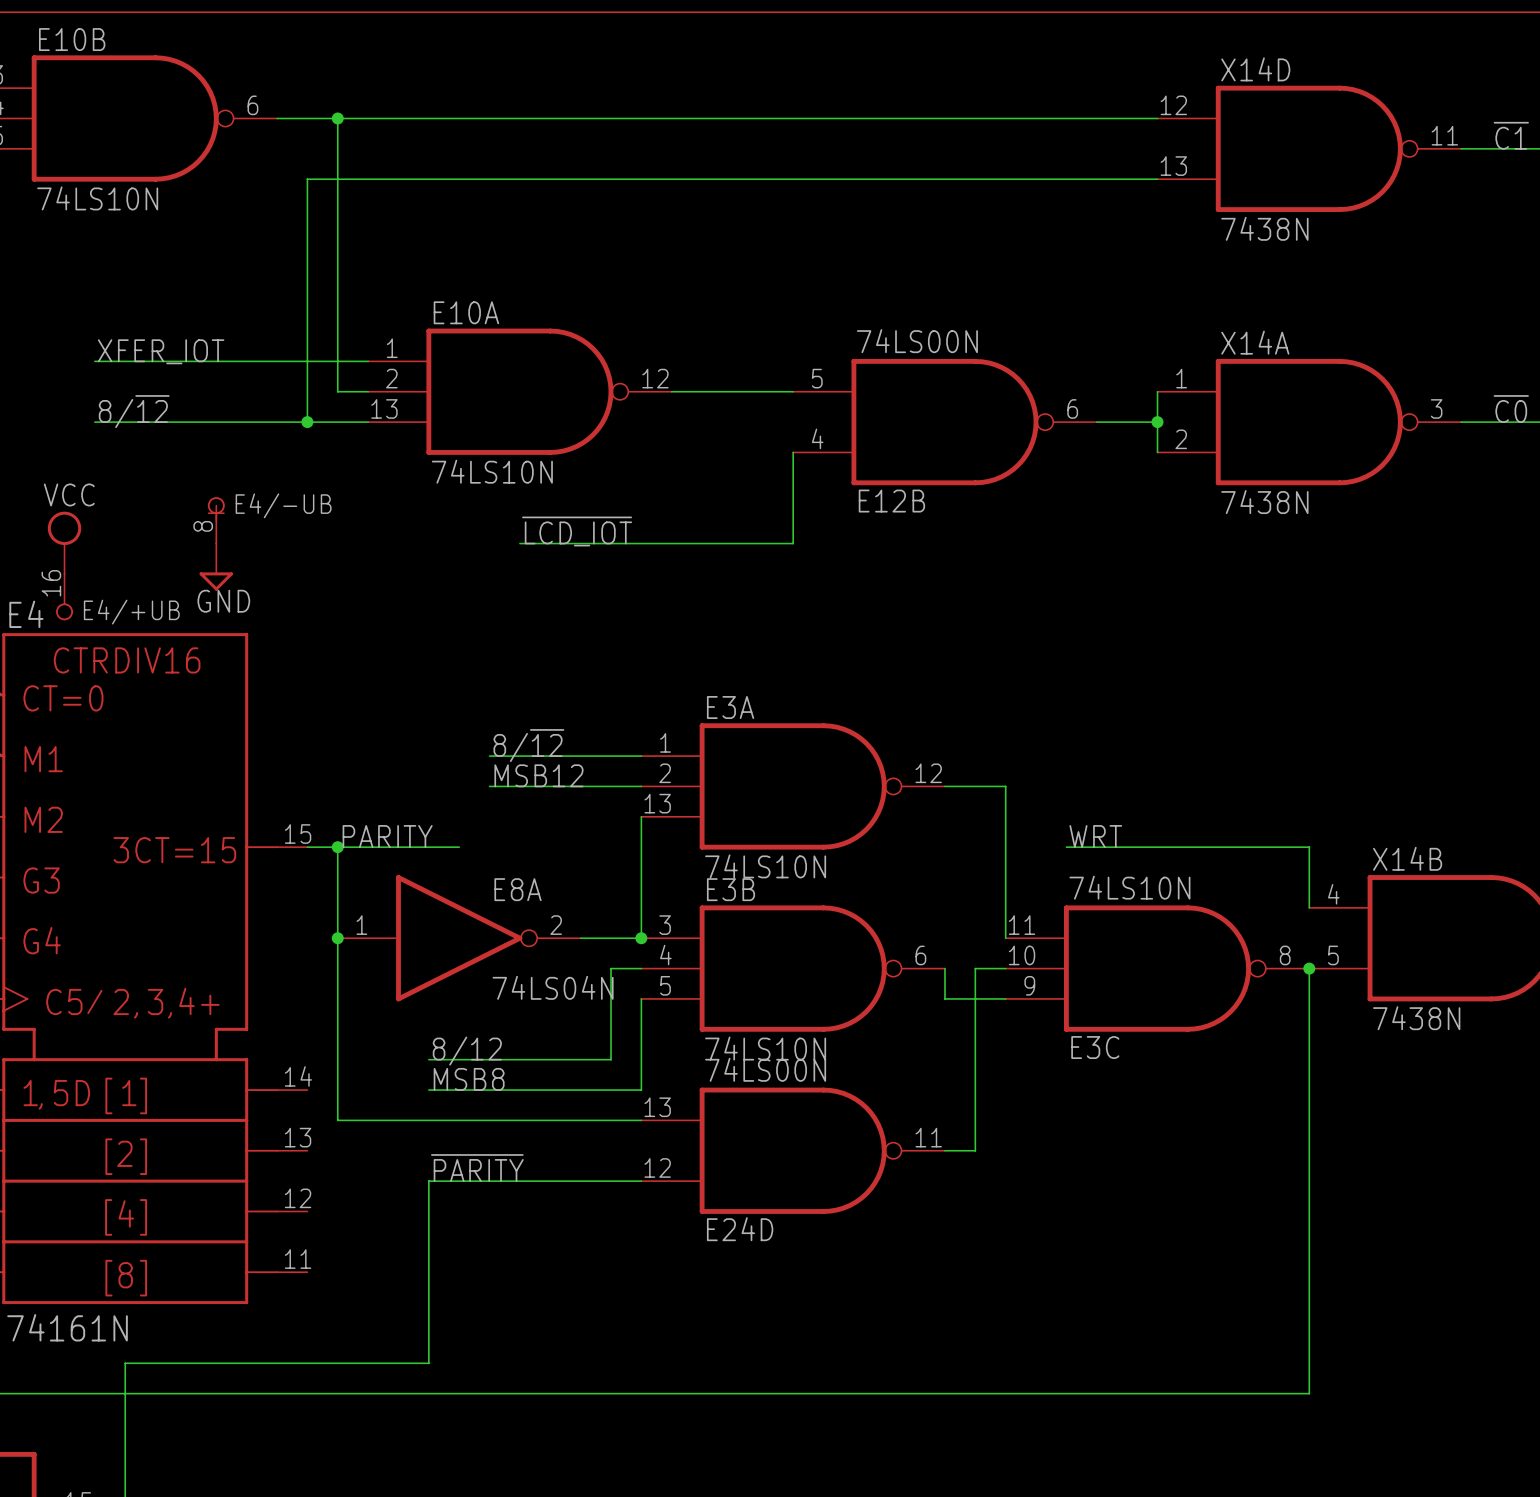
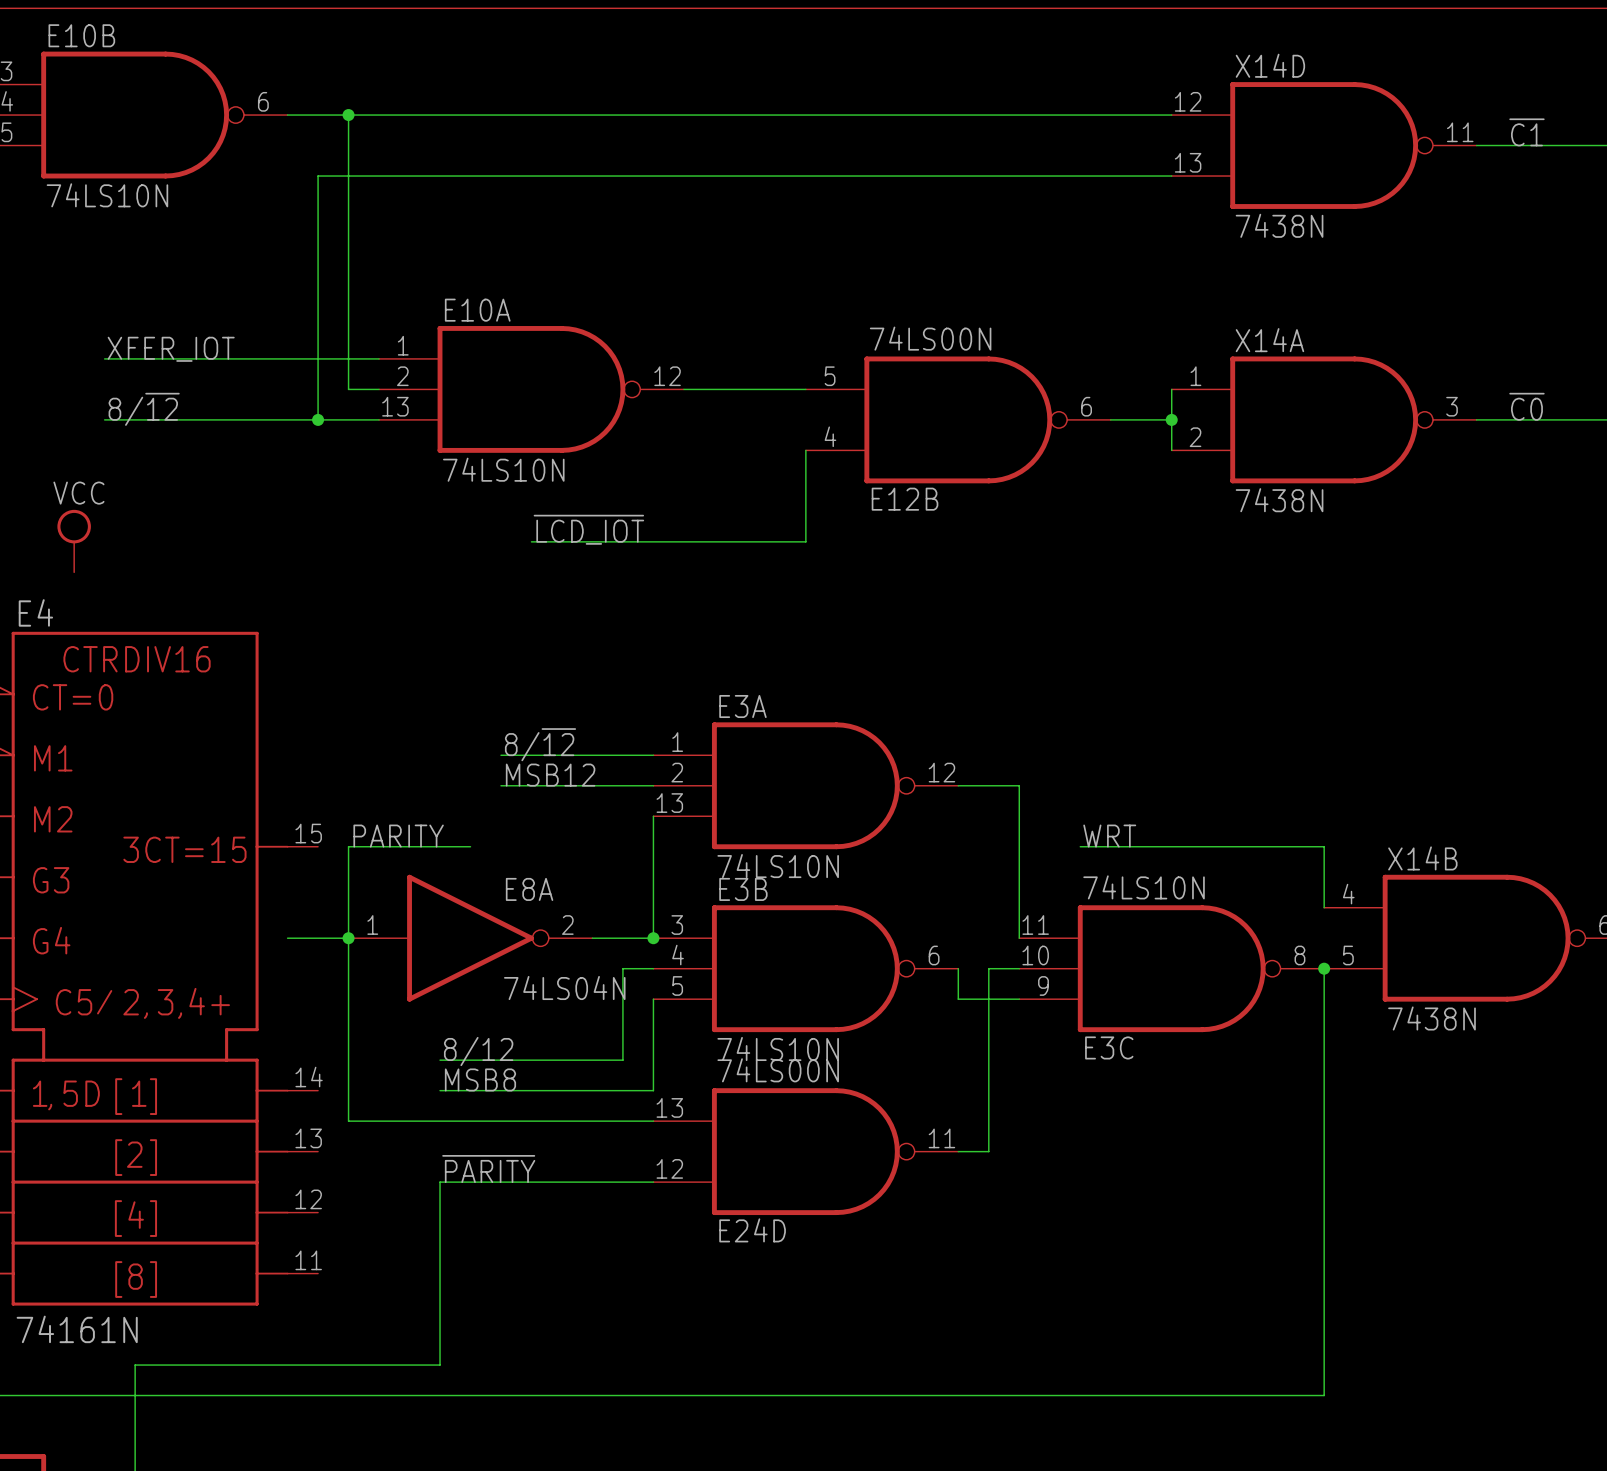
E4/-UB: (216, 520) -> none
power symbol: GND (216, 567) -> none
E4/+UB: (64, 597) -> none
wire: (307, 847) (337, 847) -> none
junction: (337, 847) -> none
wire: none -> (287, 938) (348, 938)

